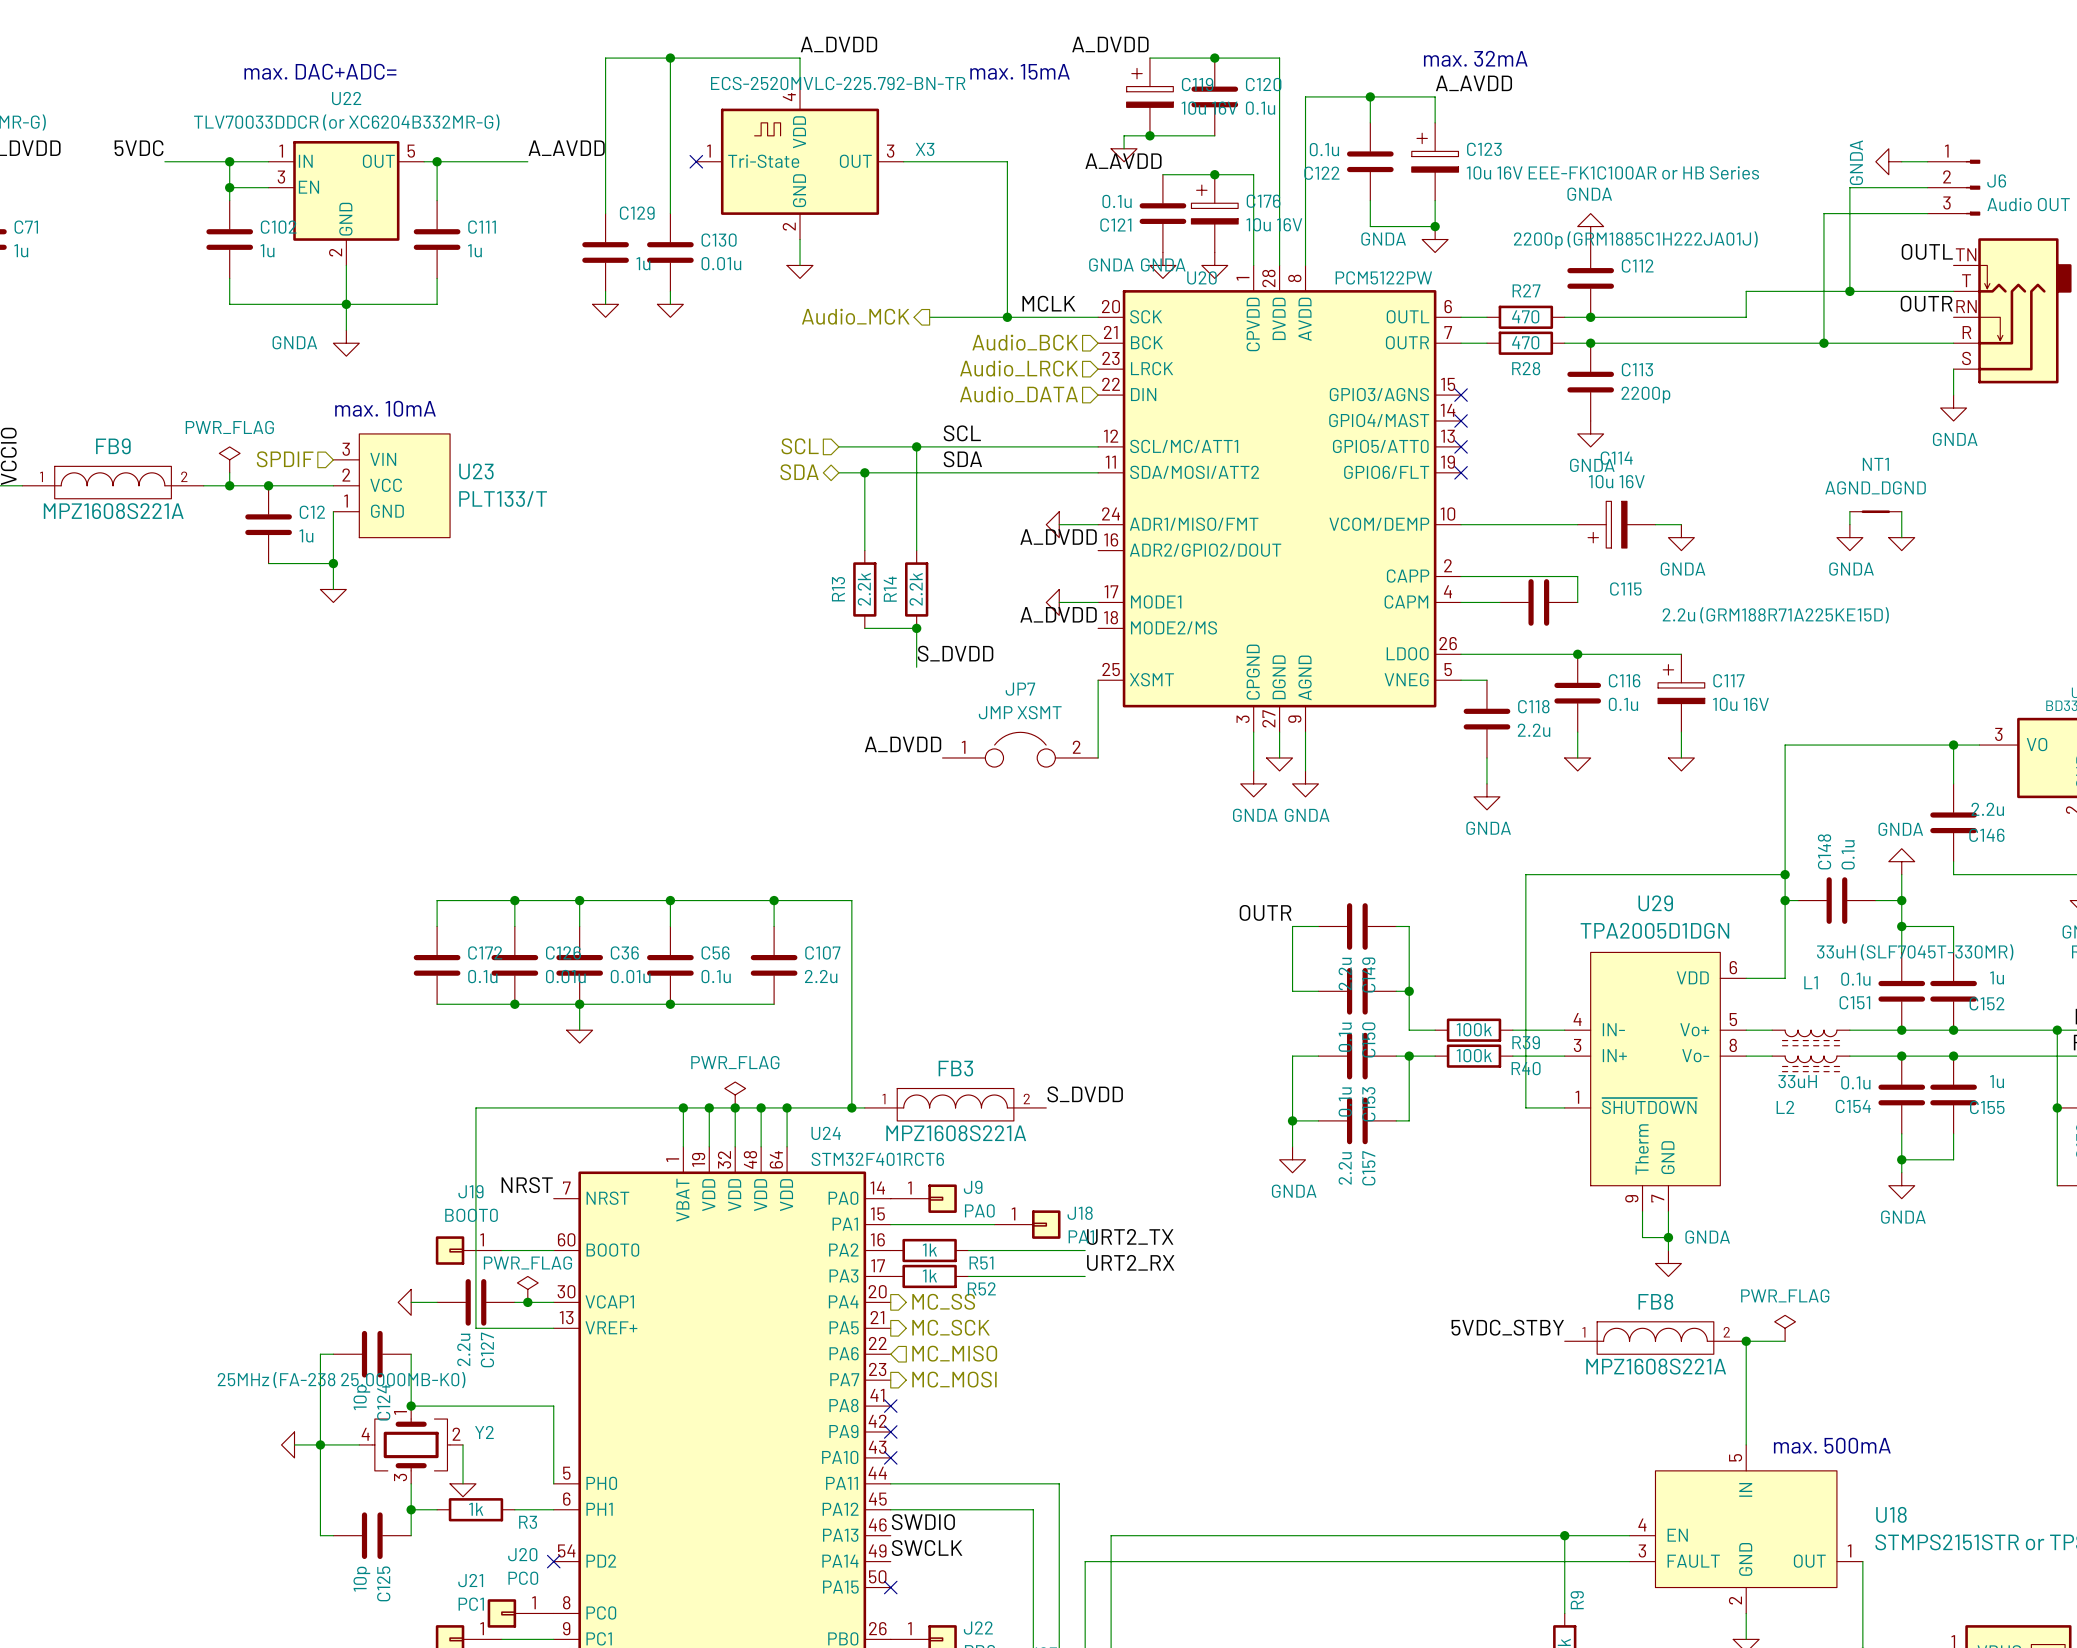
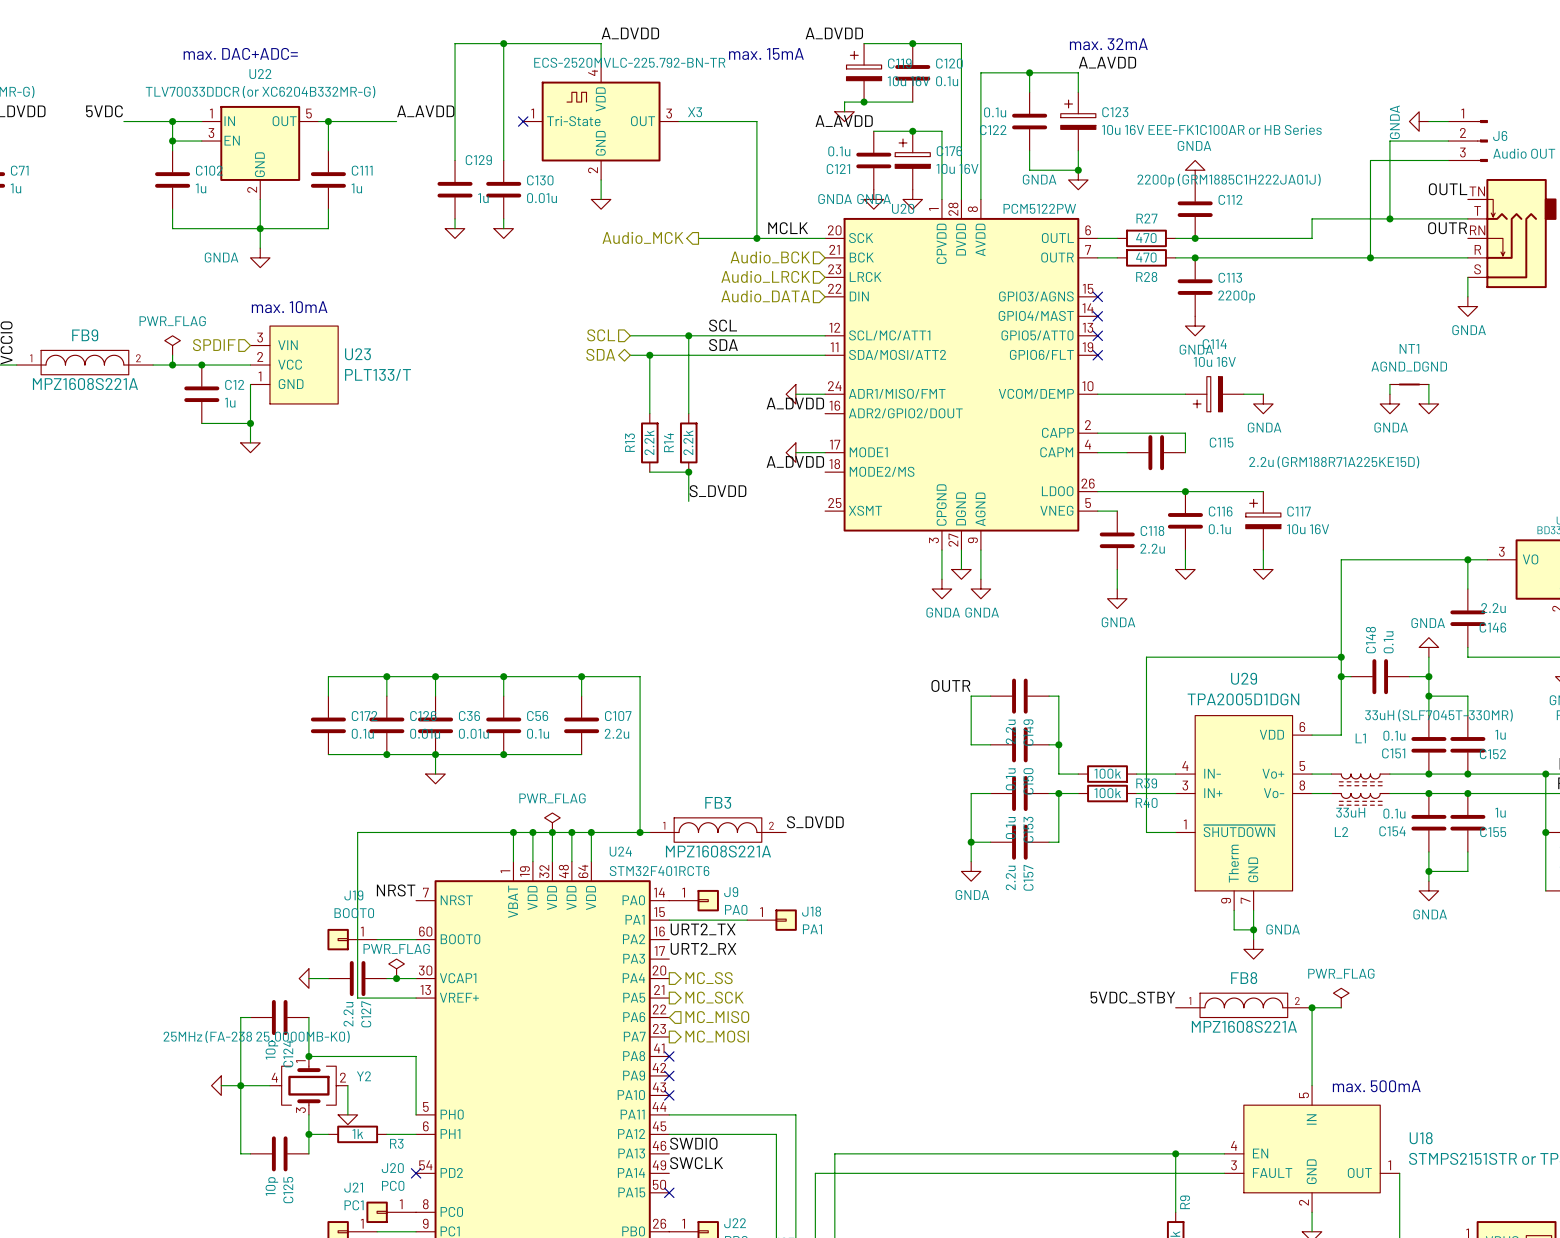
wire: (1098, 680) (1098, 757) -> none
label: A_DVDD (903, 744) -> none
JP7: JMP XSMT (1020, 749) -> none
label position: URT2_TX (1130, 1236) -> URT2_TX (703, 929)
R51: 1k (929, 1250) -> none
wire: (968, 1250) (1085, 1250) -> none
label position: URT2_RX (1130, 1262) -> URT2_RX (703, 948)
R52: 1k (929, 1276) -> none
wire: (968, 1276) (1085, 1276) -> none

